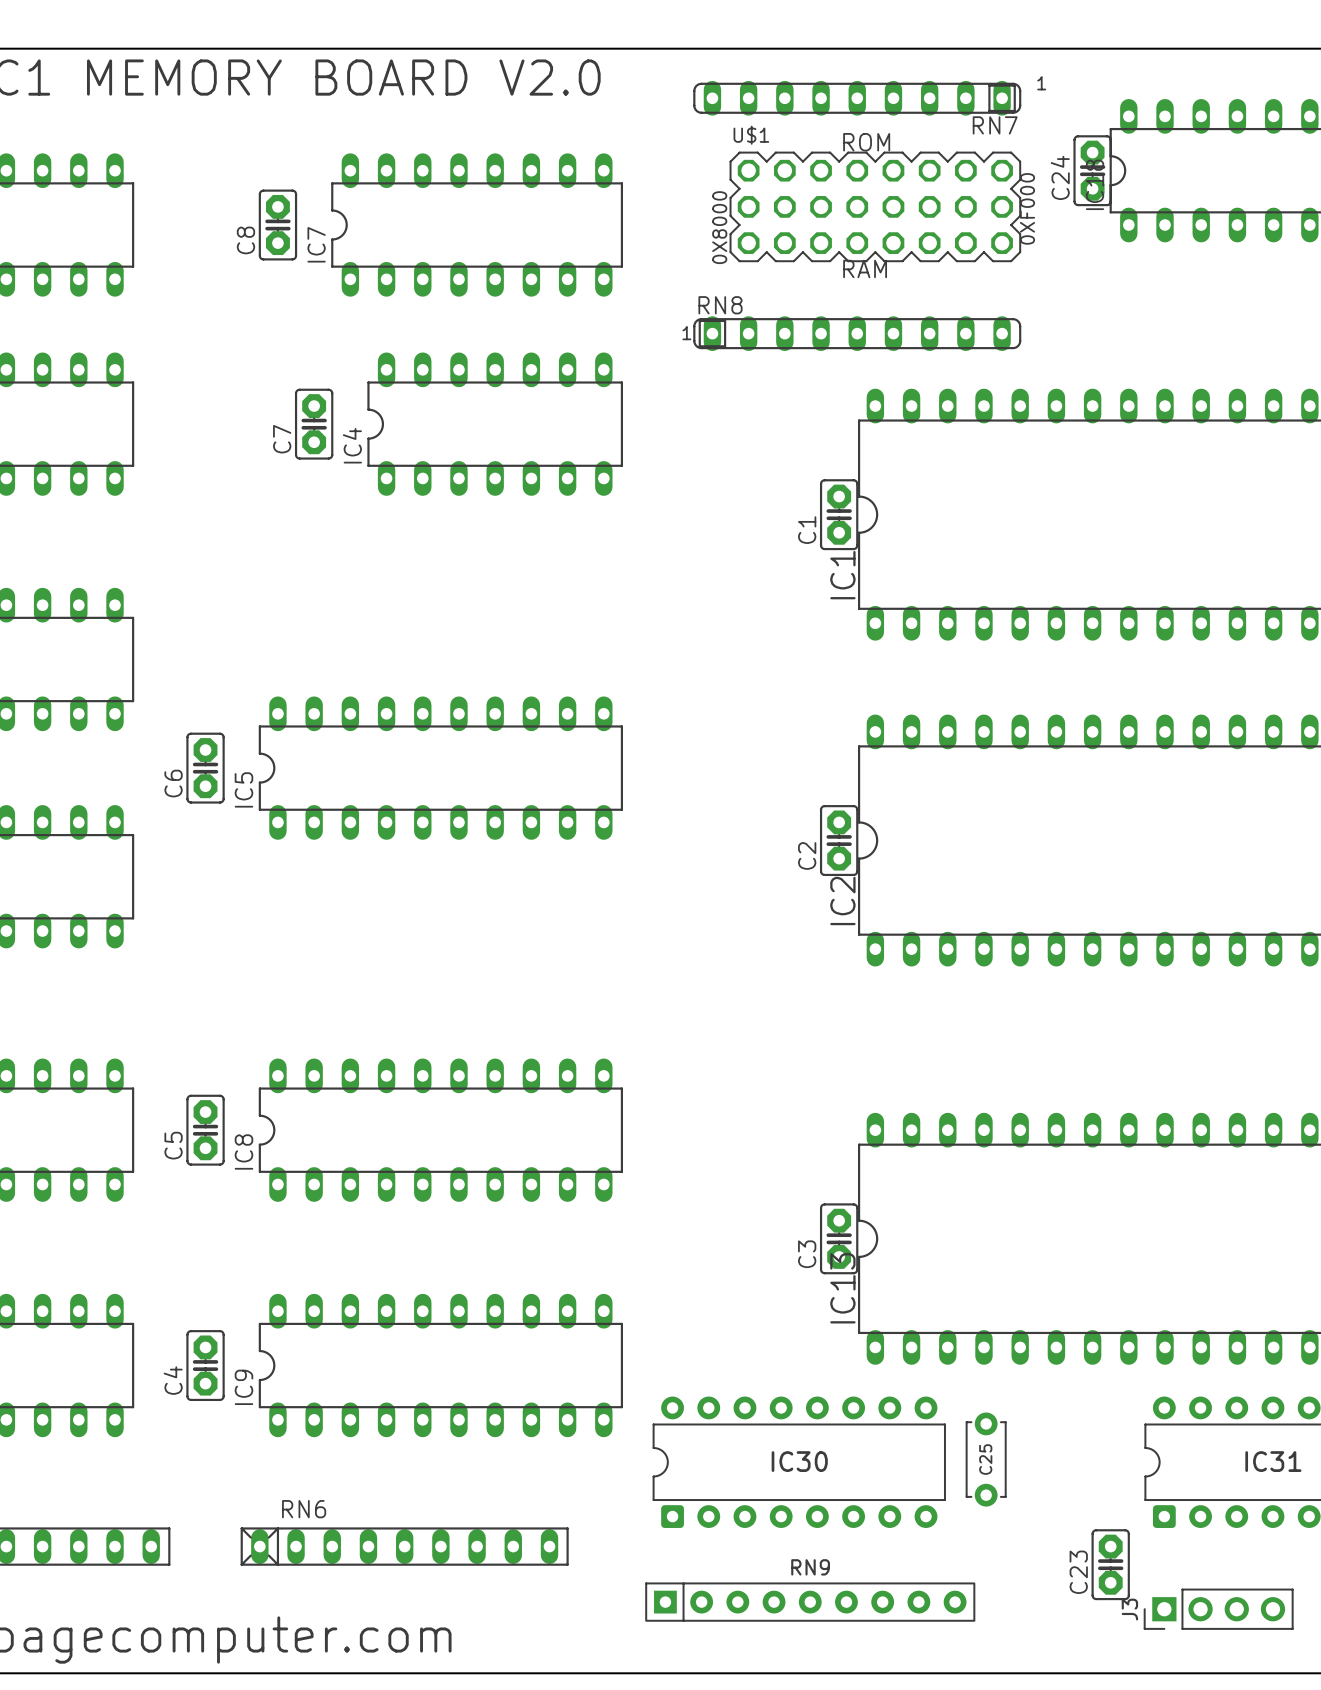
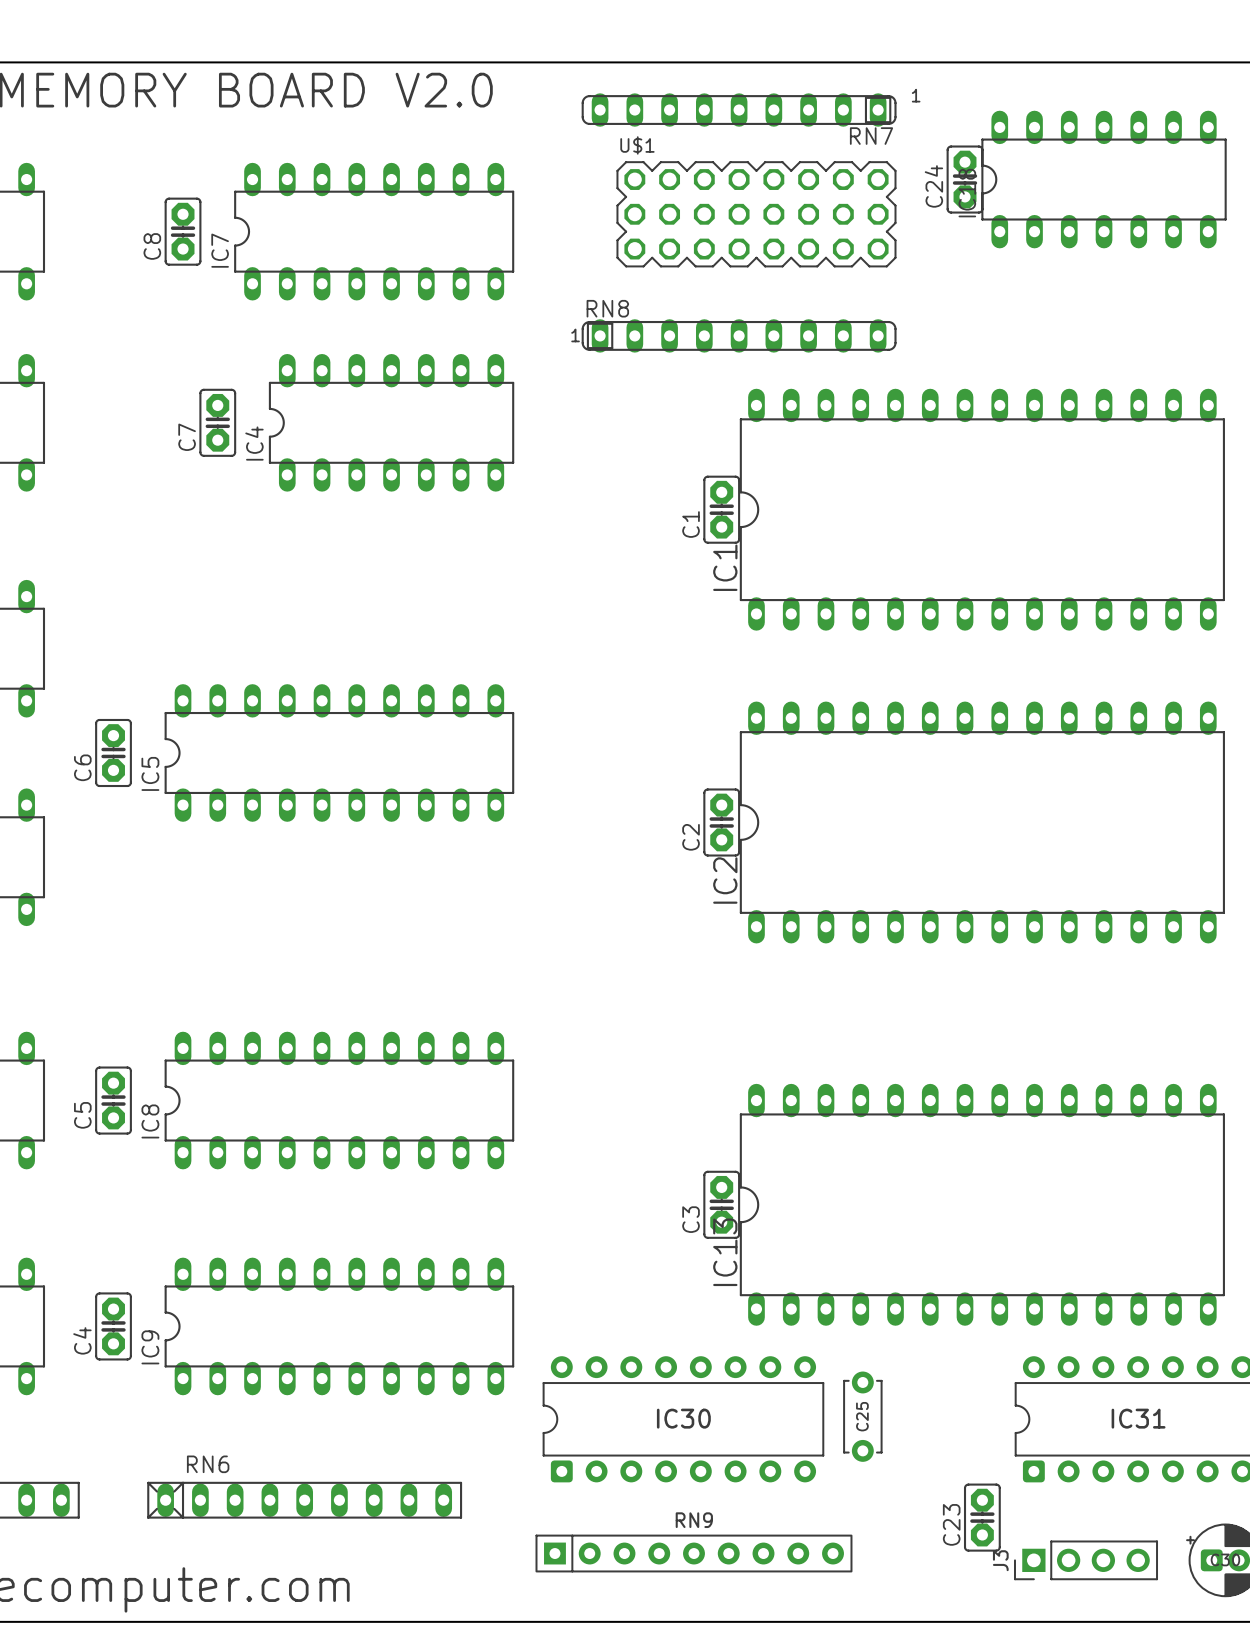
text: ROM (866, 142) -> none
text: 0XF000 (1027, 208) -> none
text: 0X8000 (719, 227) -> none
text: RAM (865, 268) -> none

